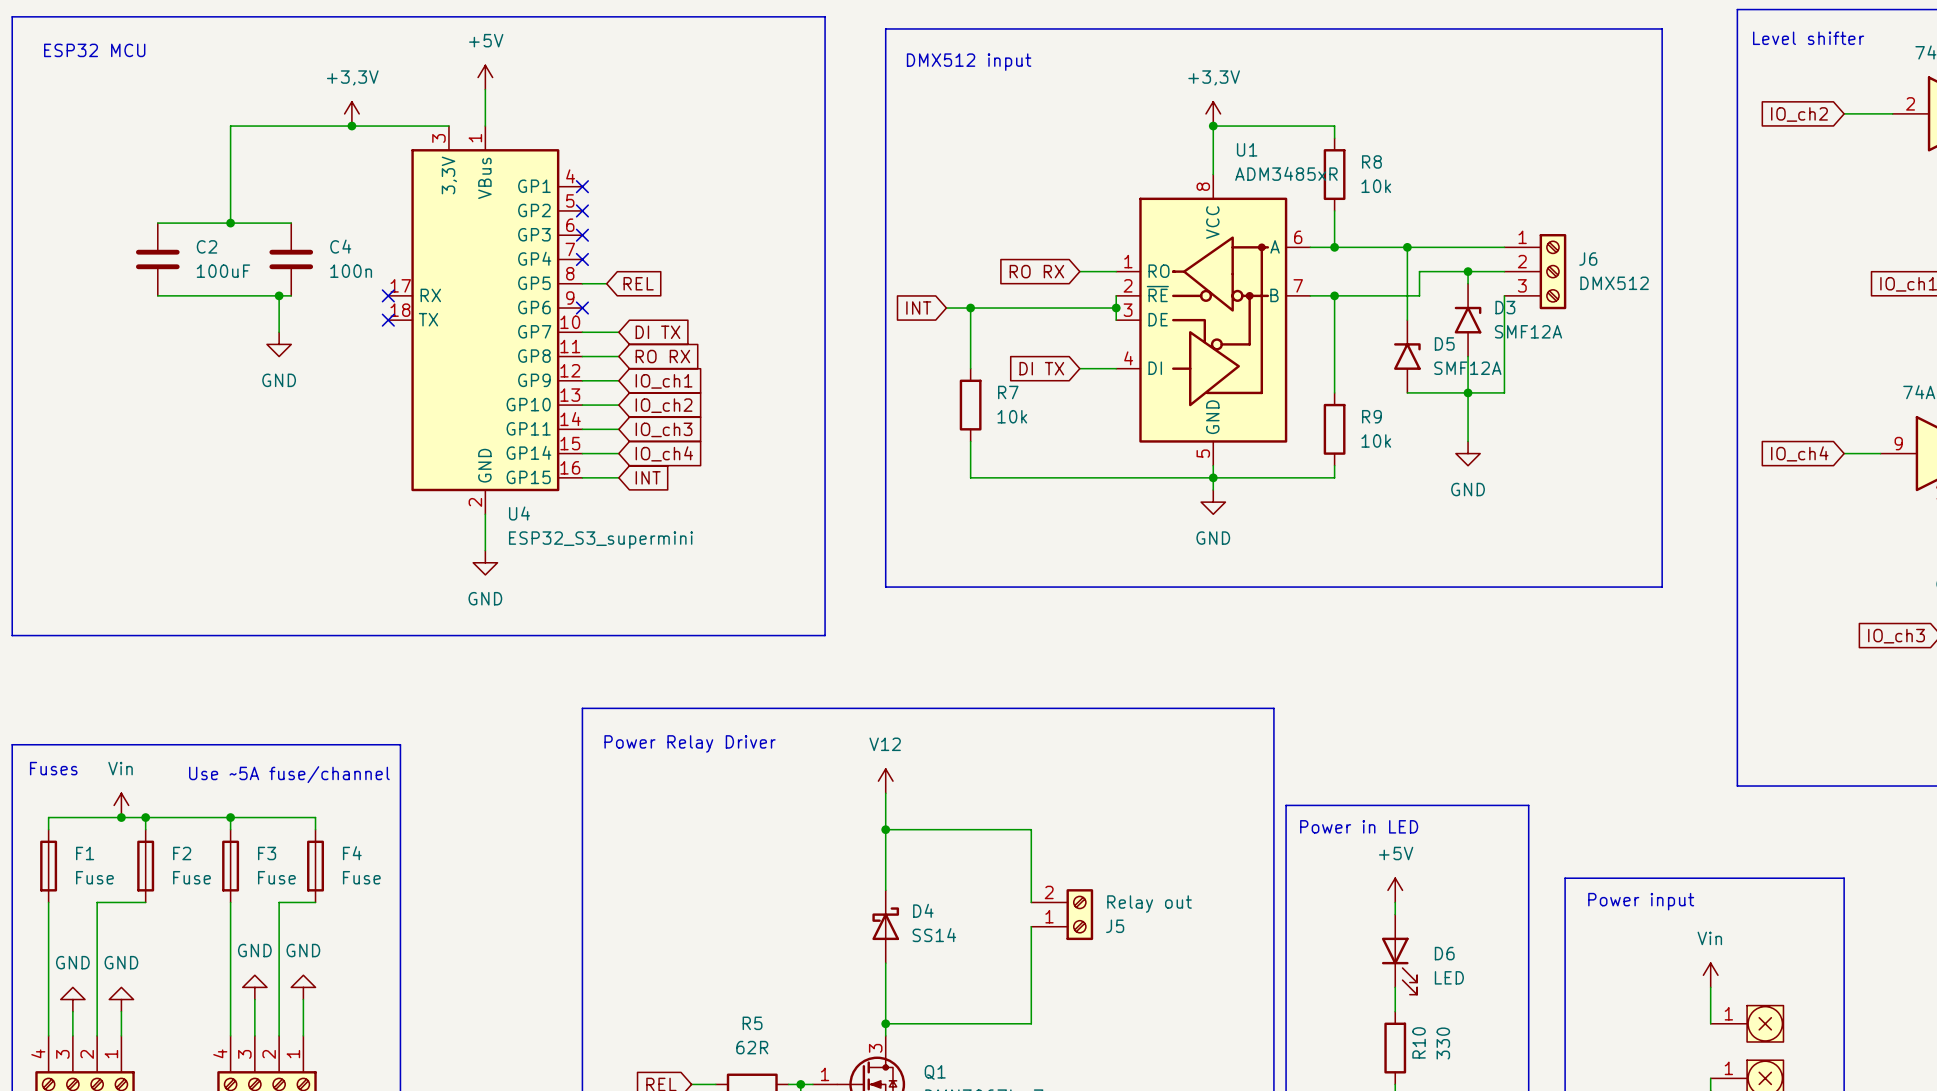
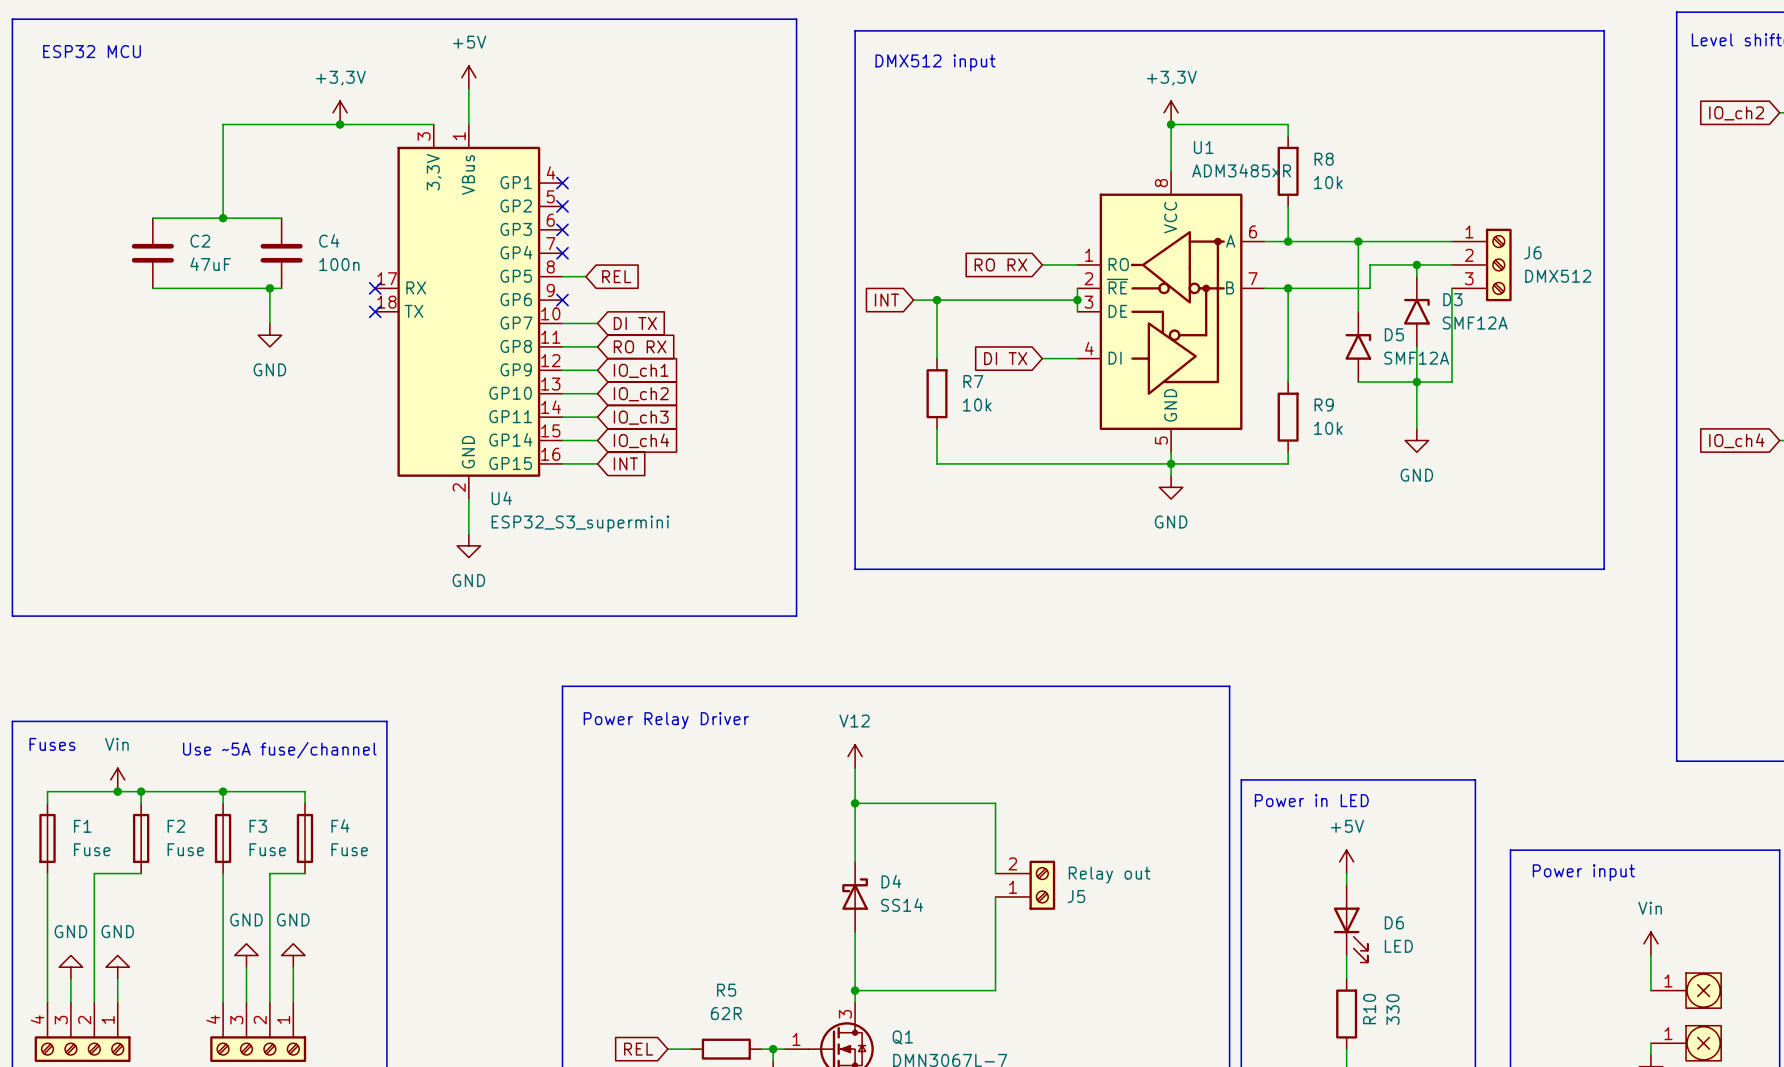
C2 value: 100uF (223, 271) -> 47uF (210, 264)

